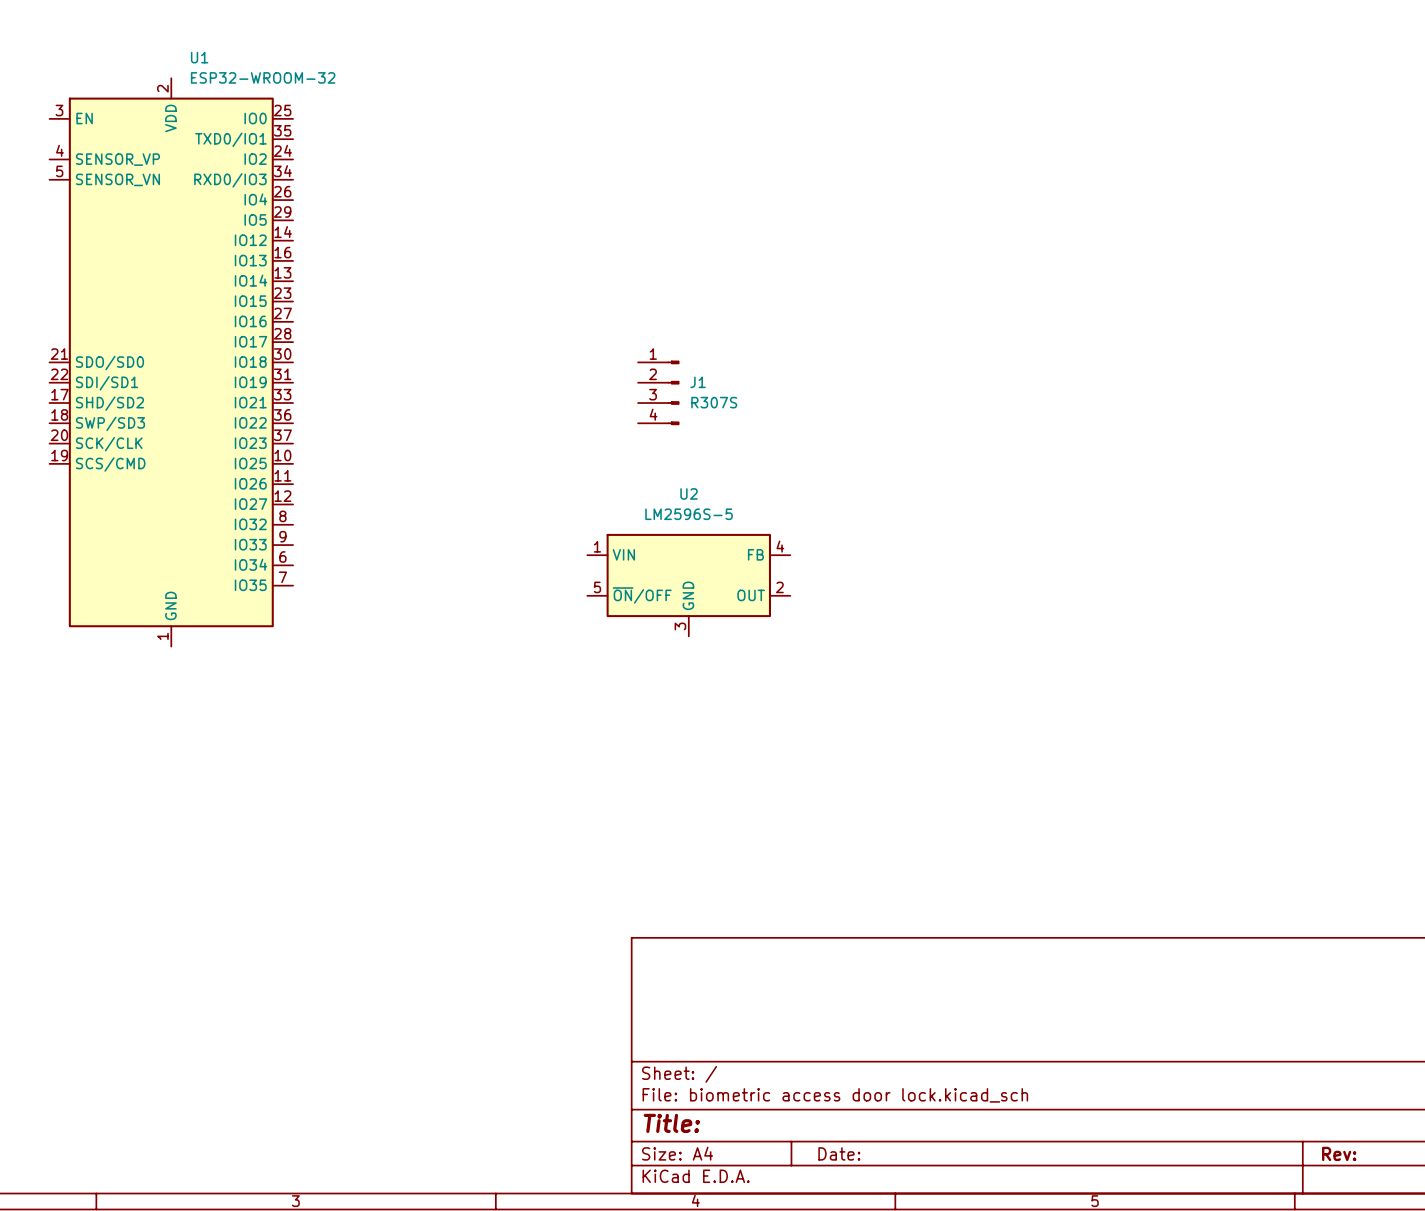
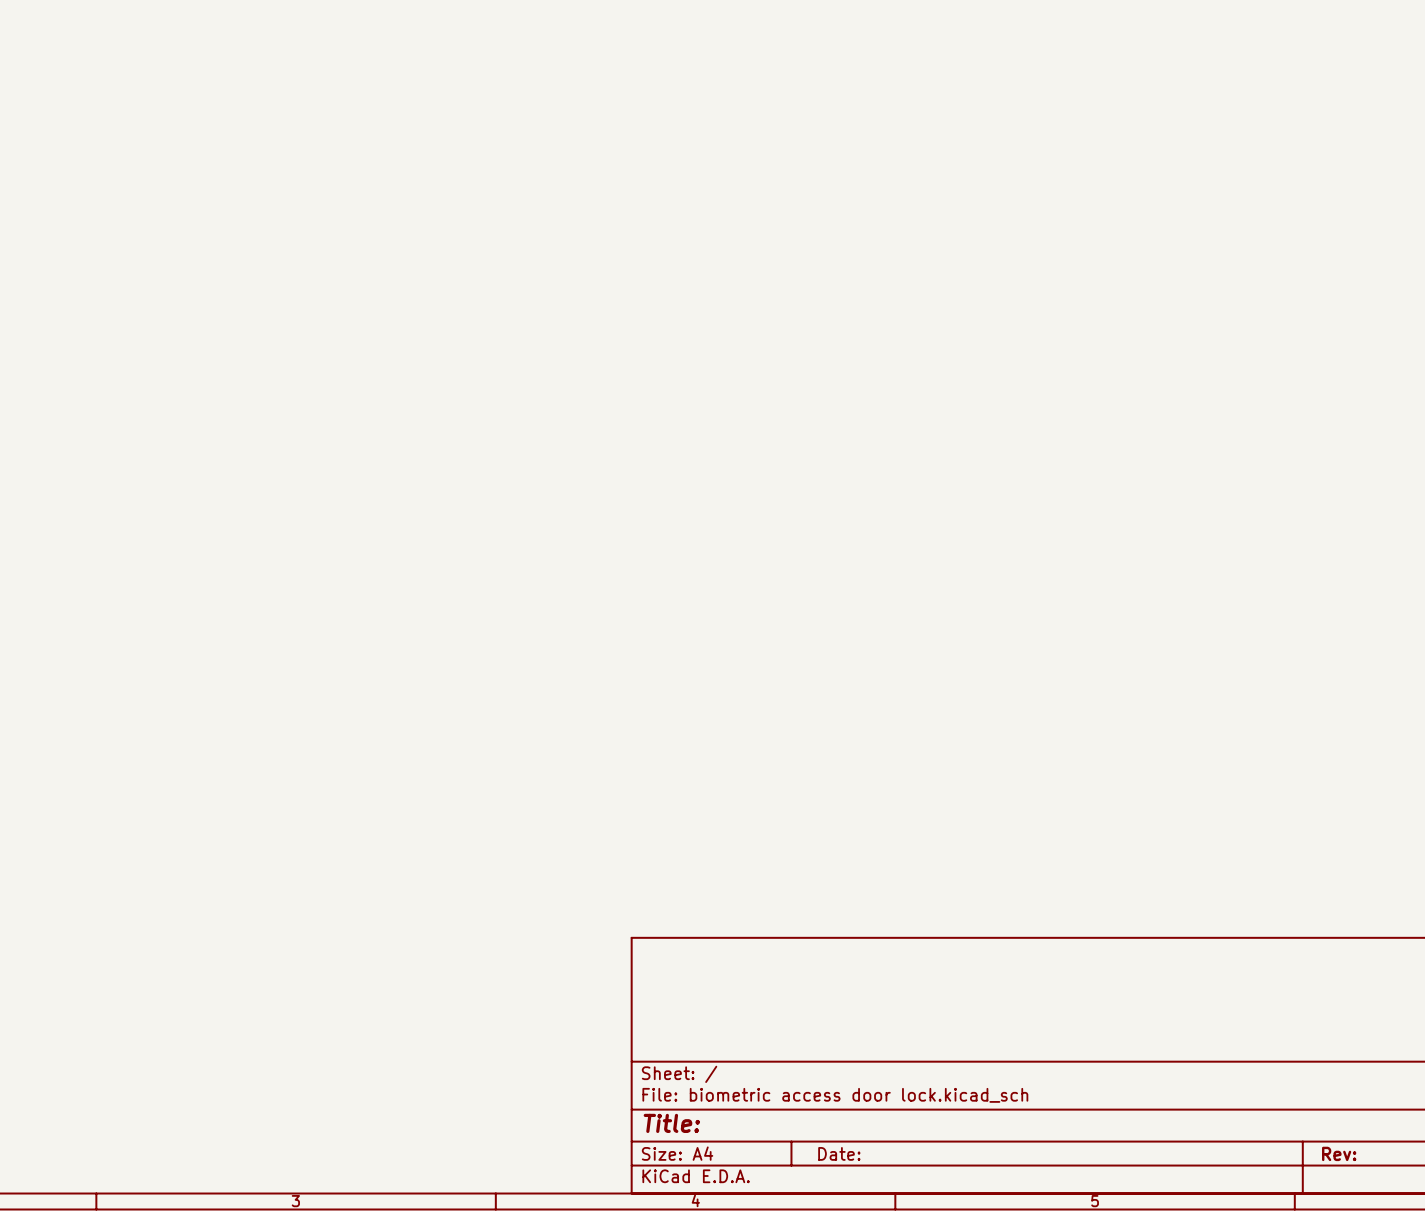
U1: ESP32-WROOM-32 (171, 362) -> none
J1: R307S (658, 392) -> none
U2: LM2596S-5 (688, 585) -> none

